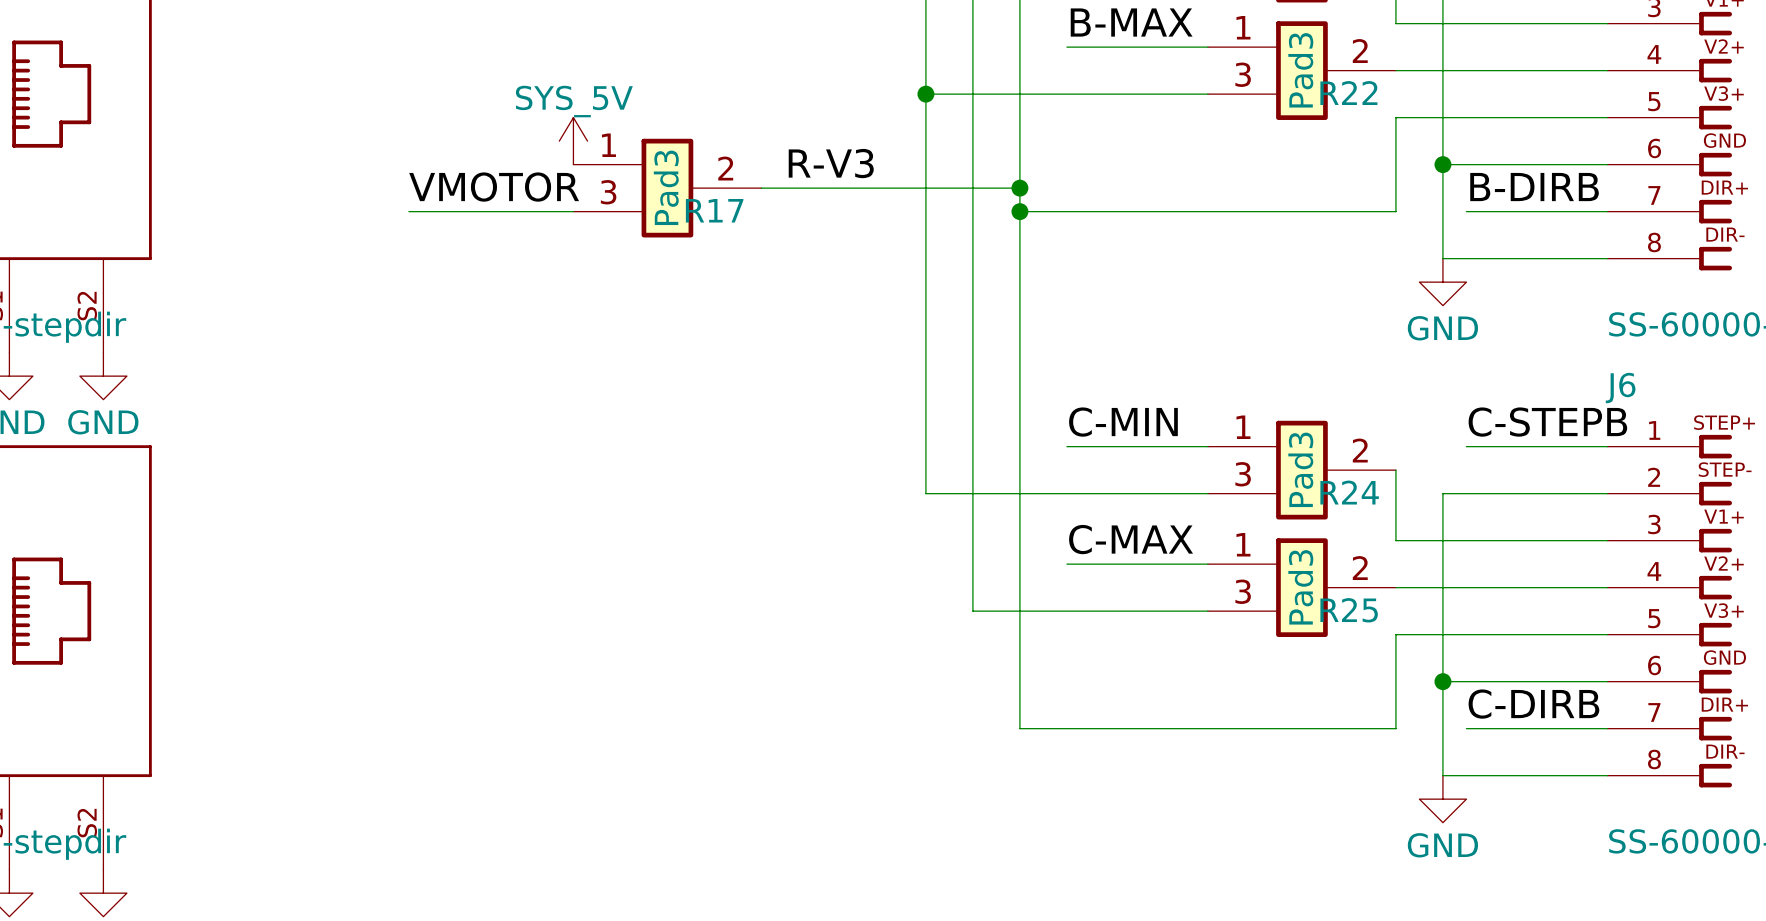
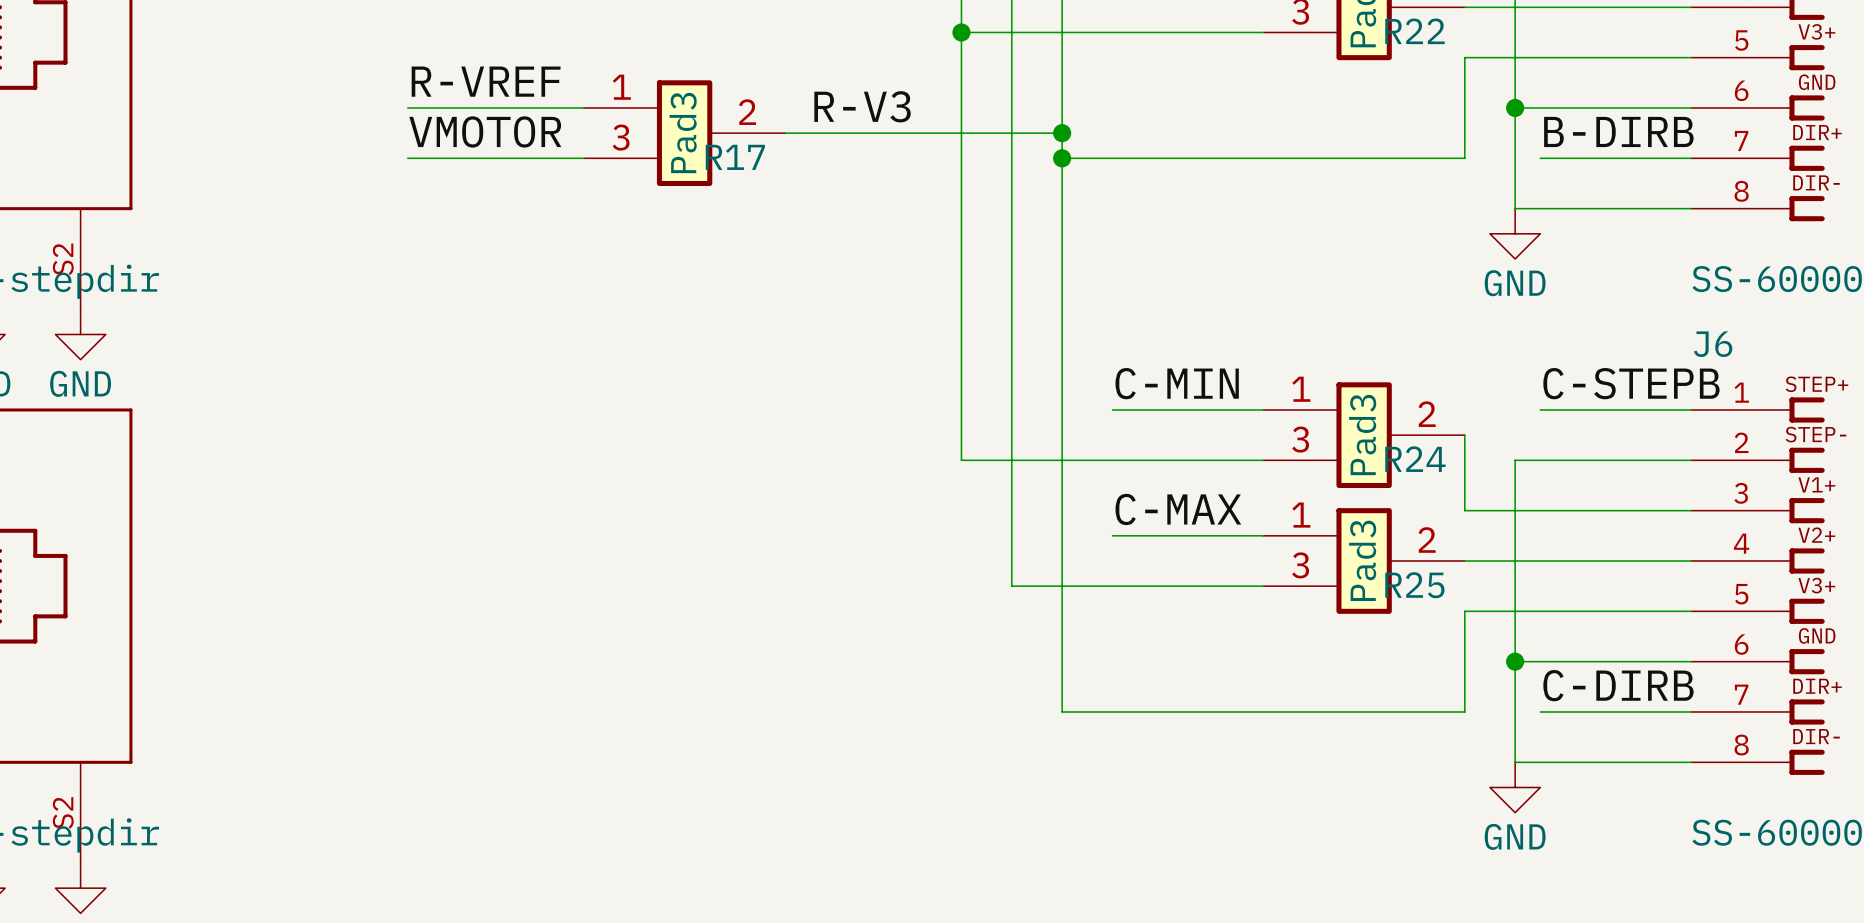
label: none -> R-VREF (486, 81)
power symbol: SYS_5V (573, 141) -> none
wire: none -> (407, 107) (583, 107)

